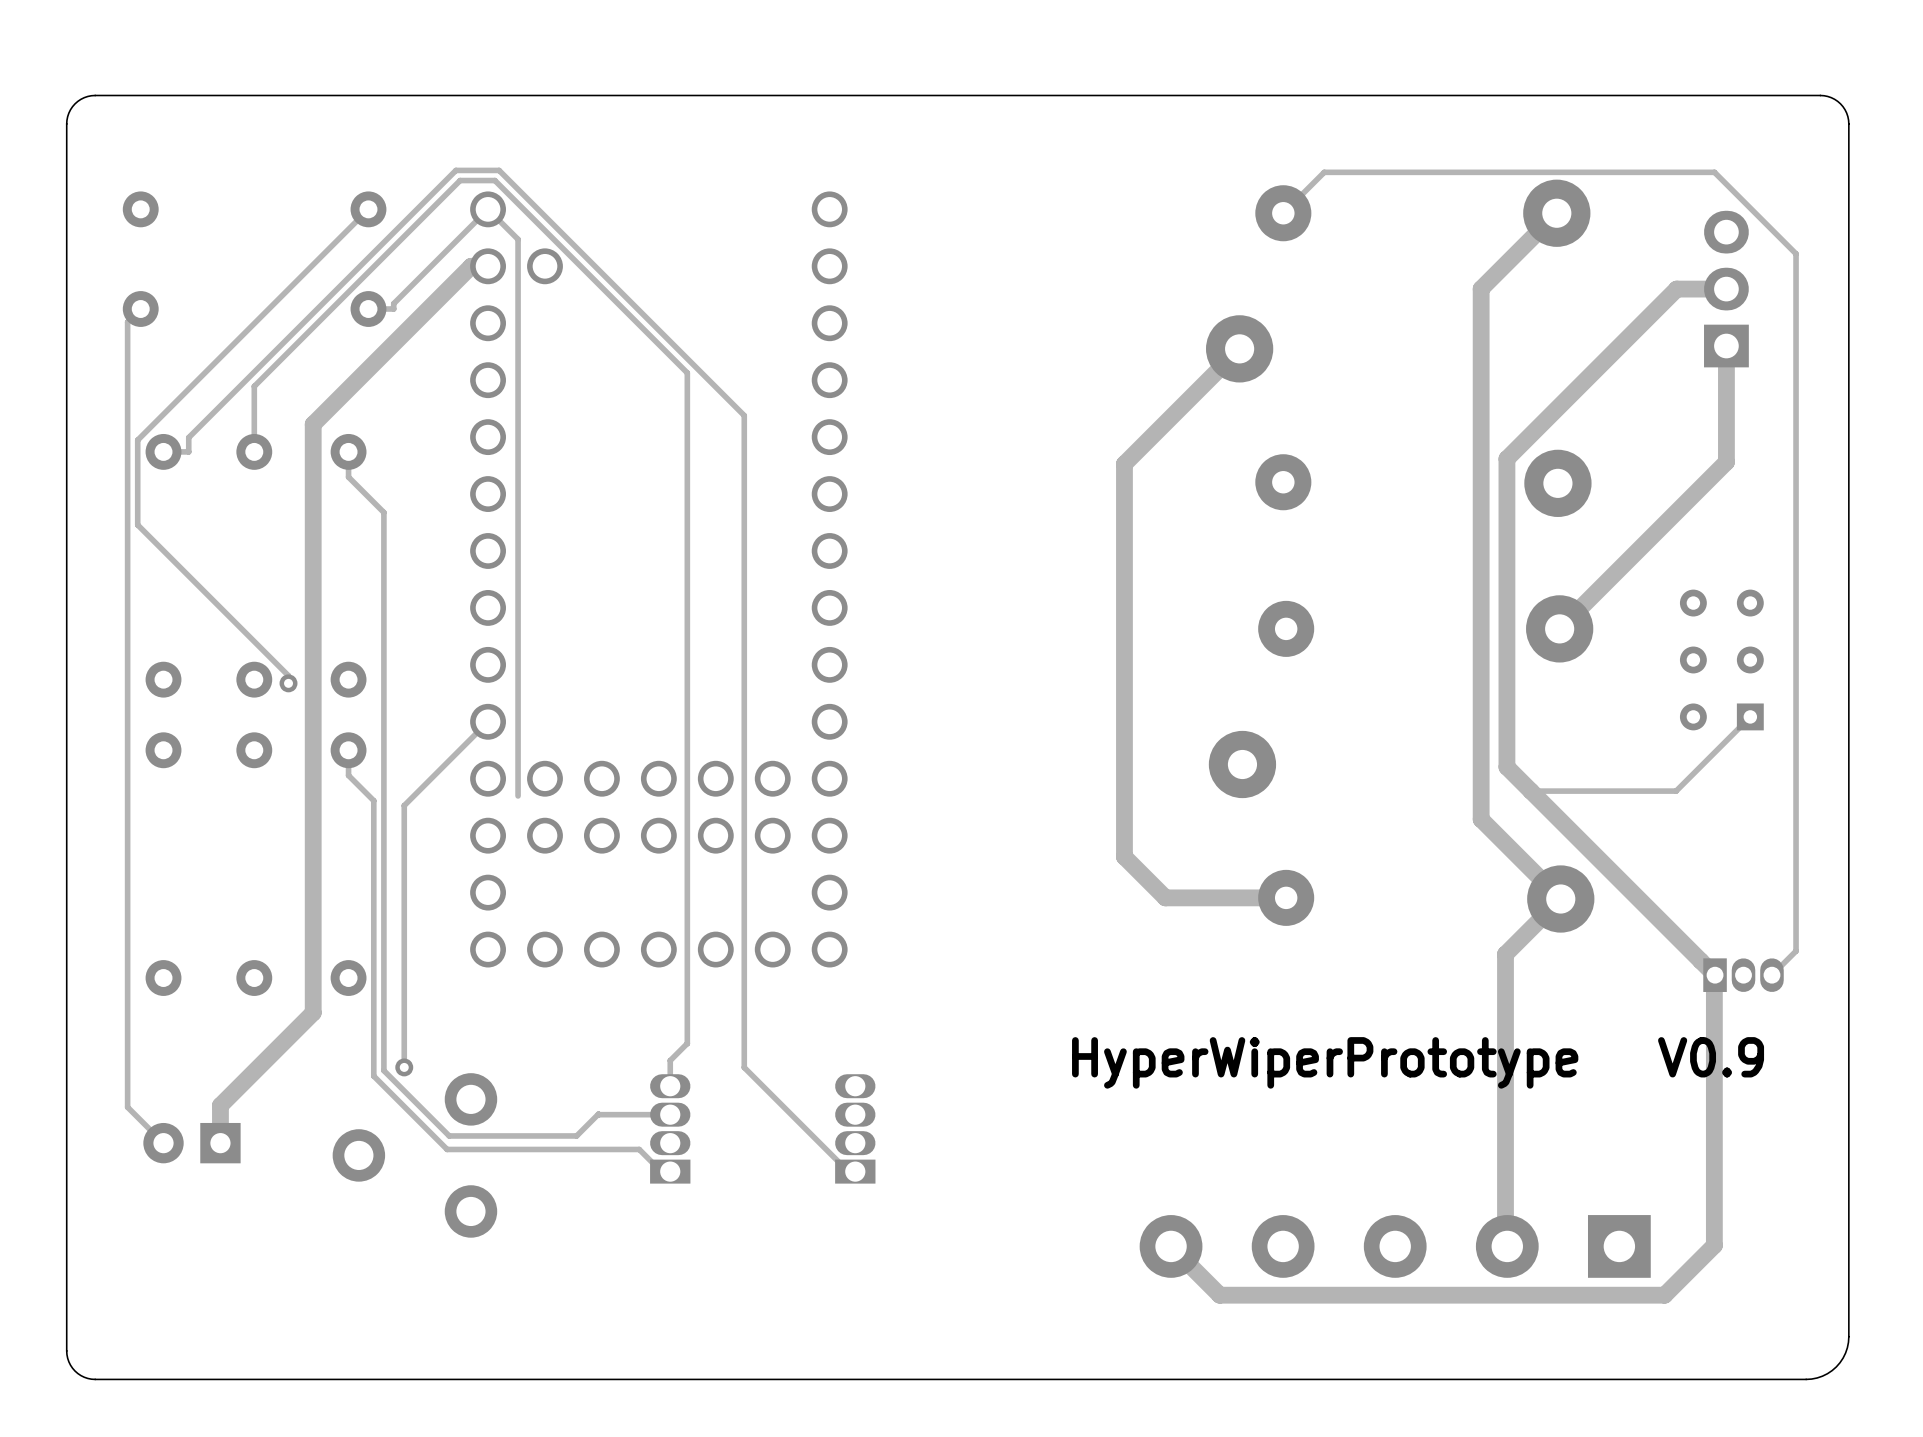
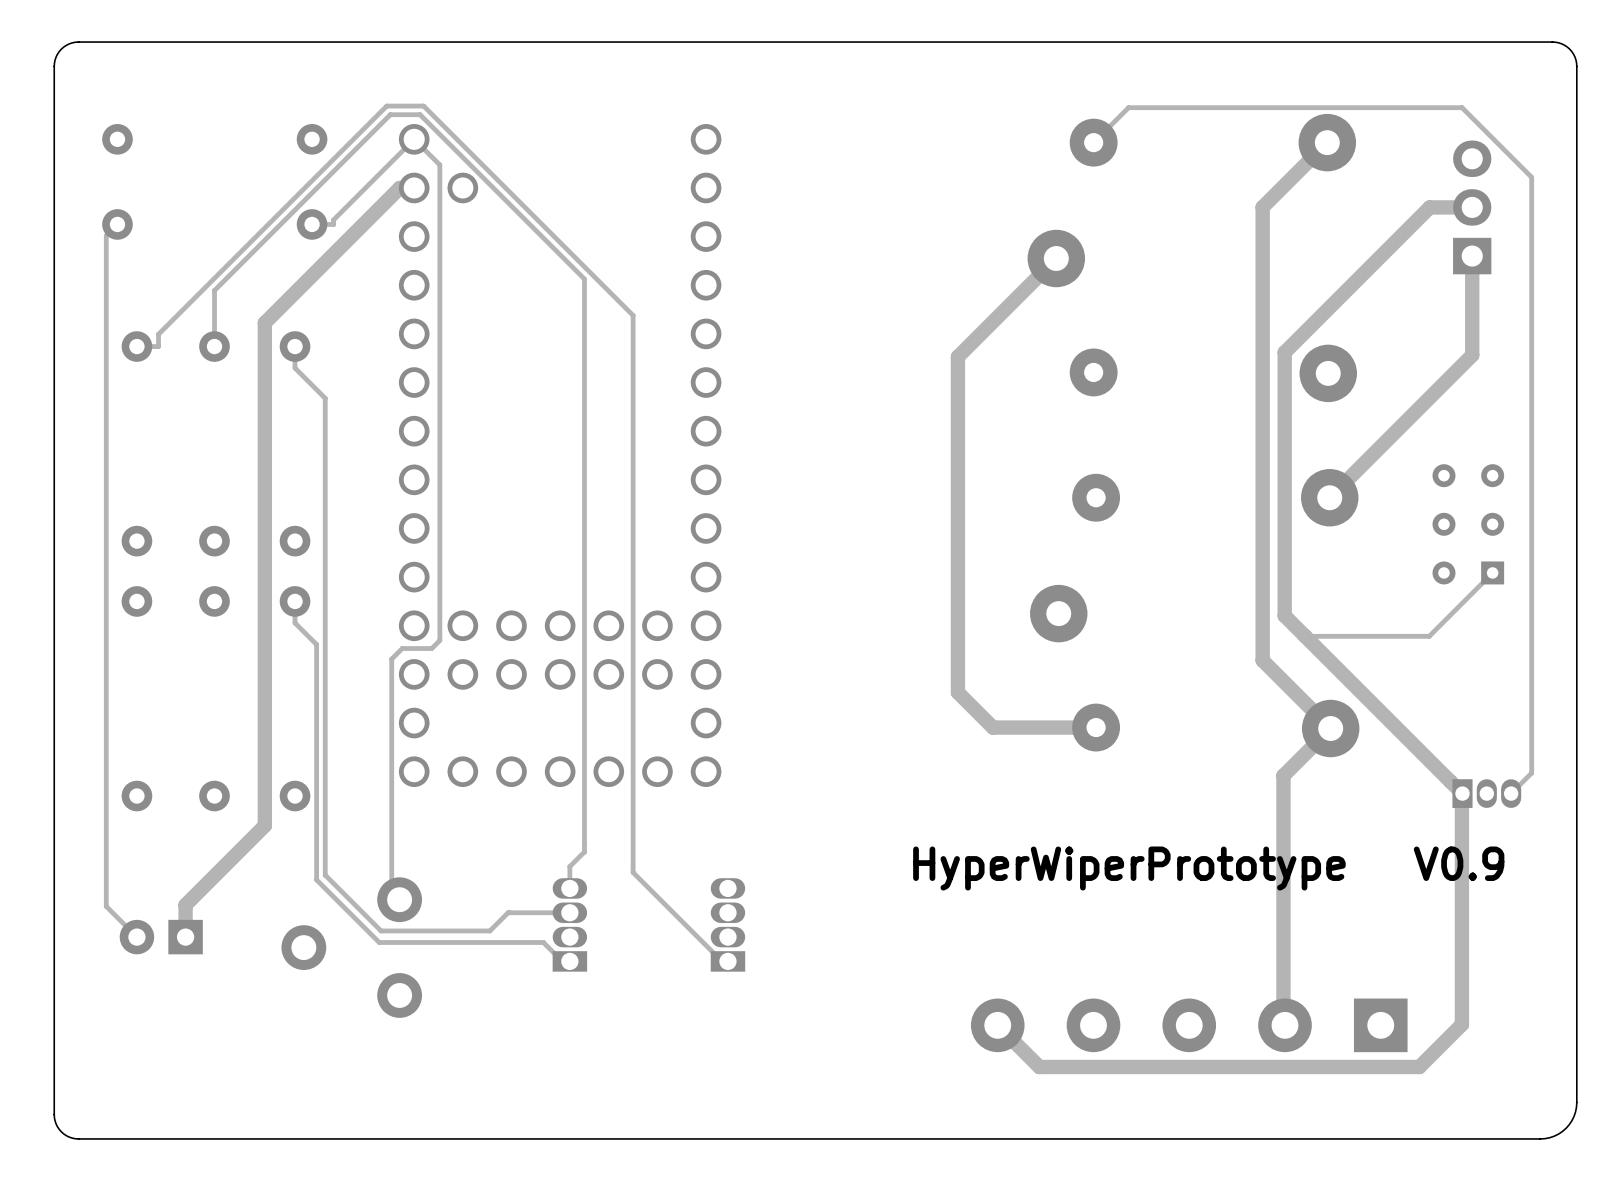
track: (368, 209) (137, 440) (137, 524) (288, 675) (288, 683) -> none
via: (288, 683) -> none
track: (488, 721) (404, 805) (404, 1067) -> none
track: none -> (439, 640) (431, 648) (402, 648) (391, 659) (391, 891) (399, 899)
via: (404, 1067) -> none

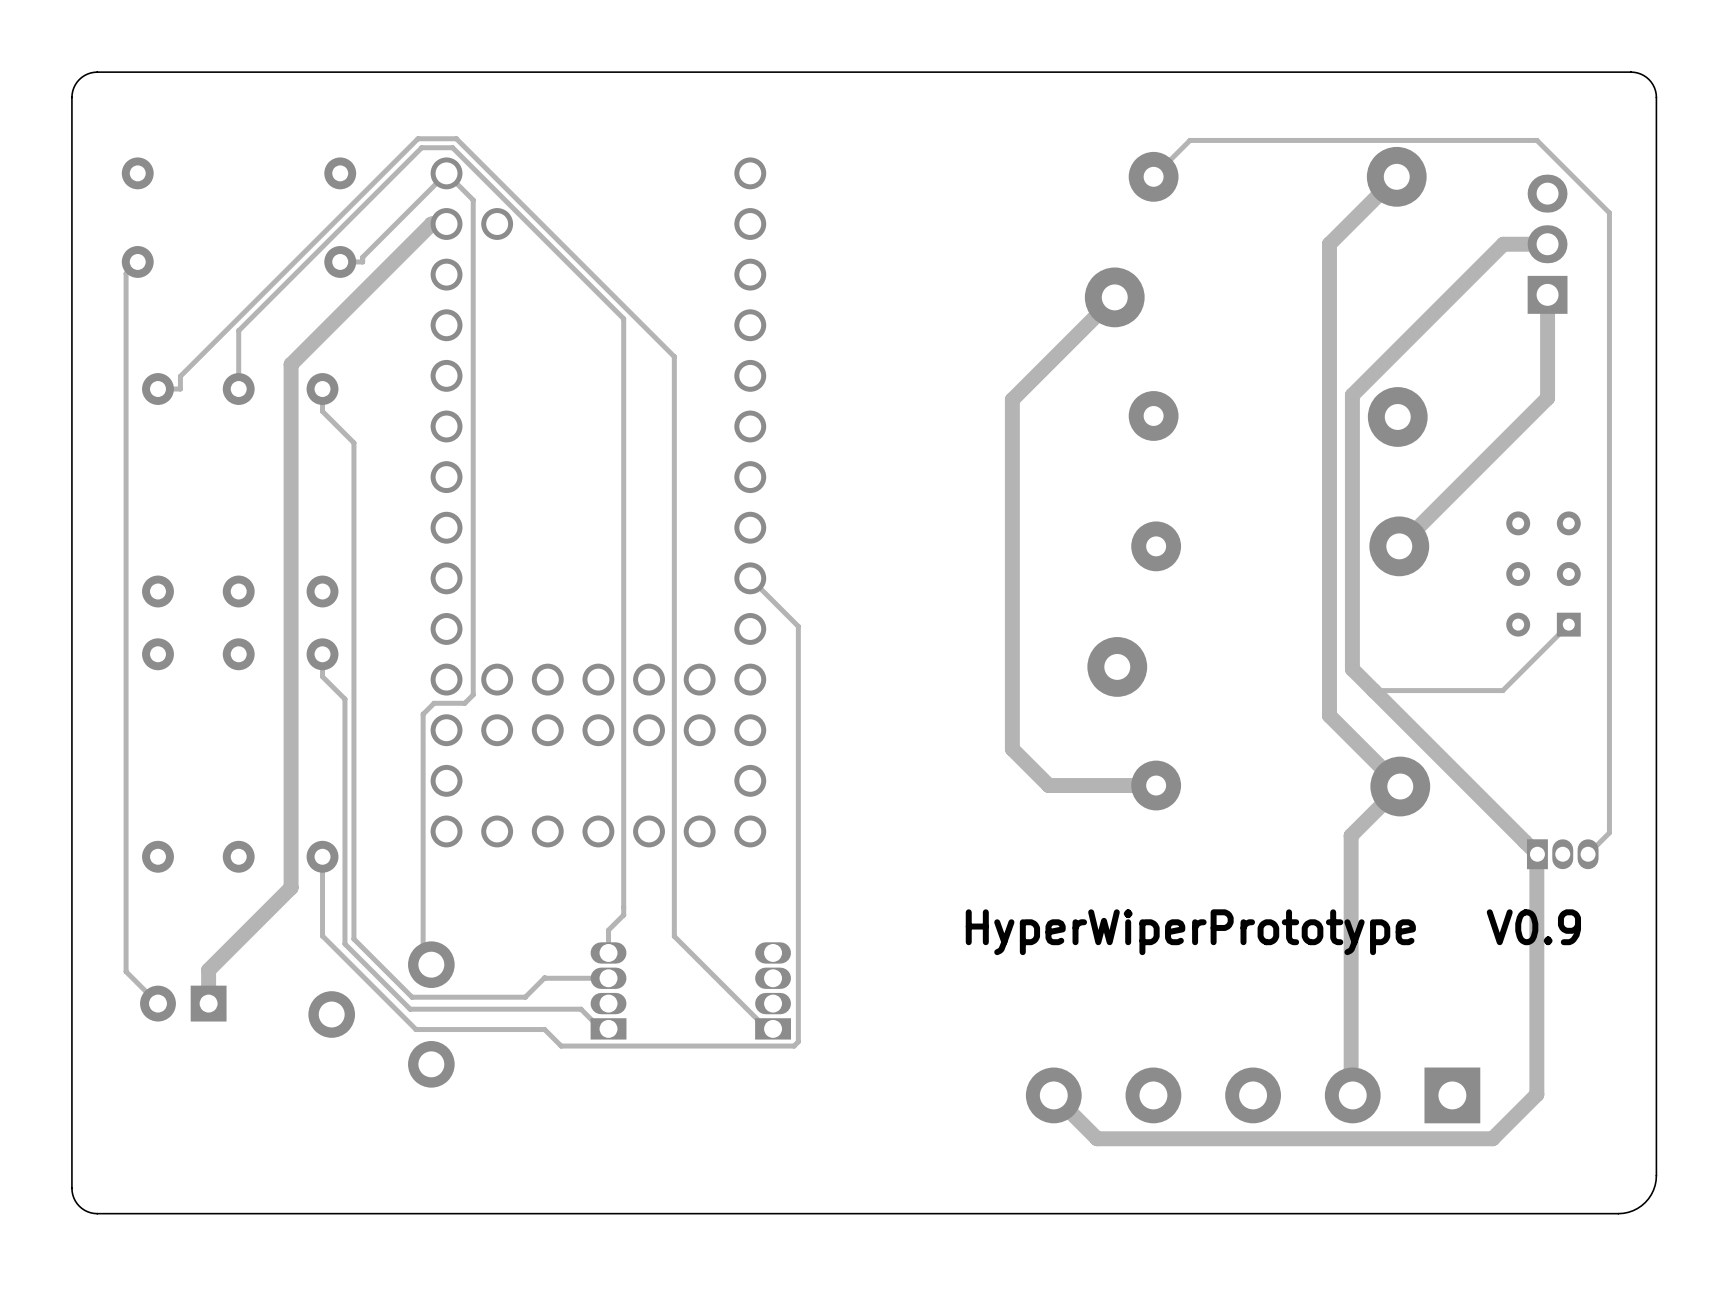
track: none -> (750, 578) (798, 626) (798, 1041) (794, 1046) (561, 1046) (544, 1029) (416, 1029) (322, 936) (322, 856)

